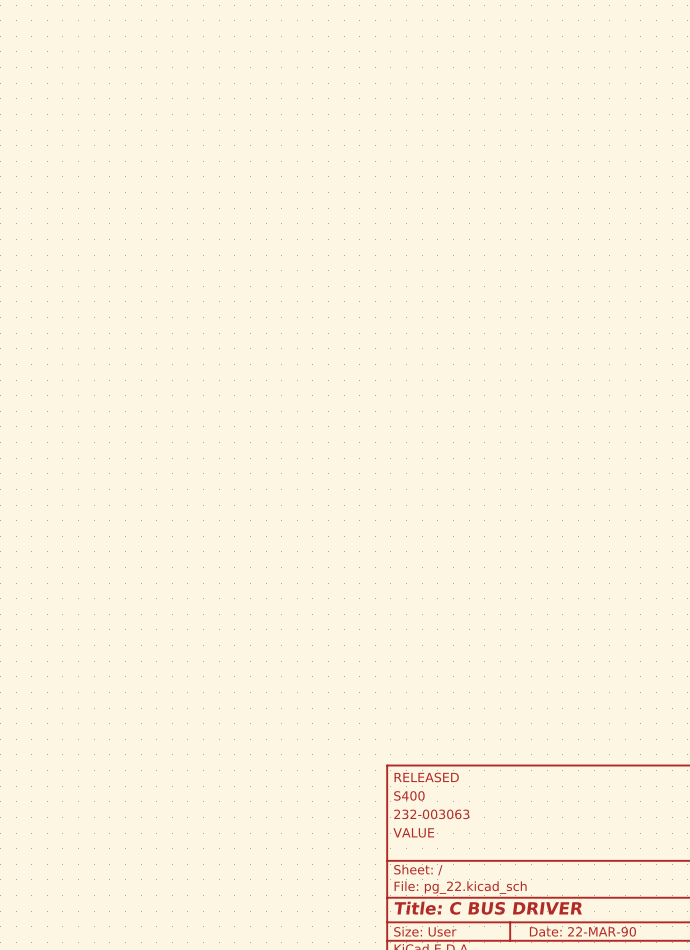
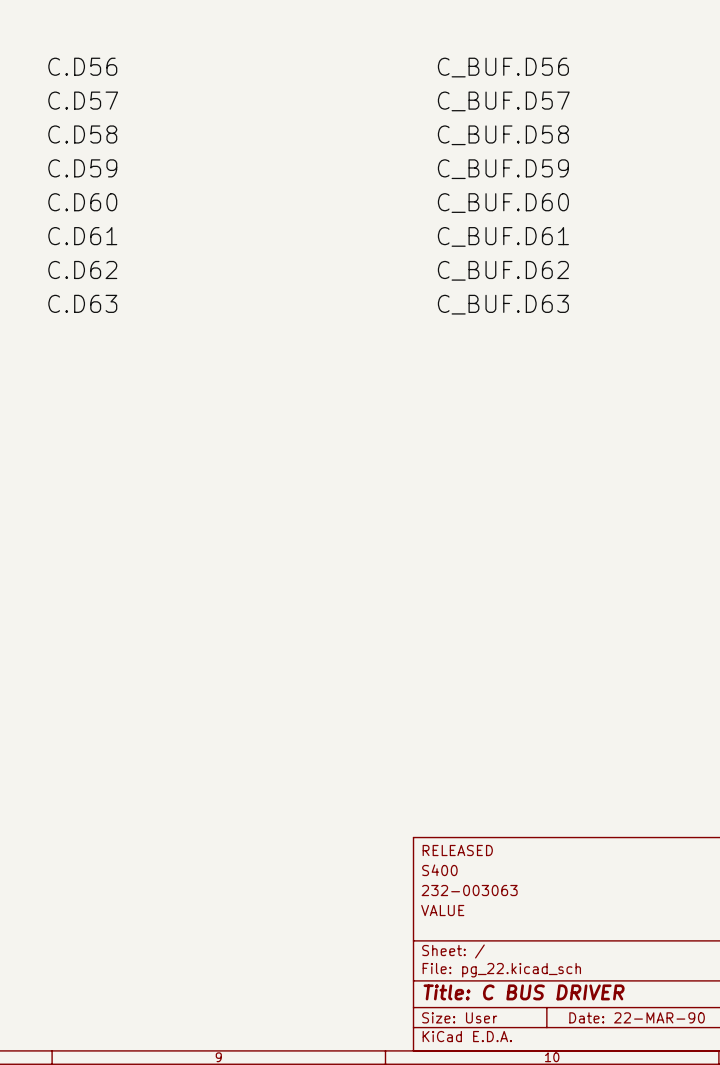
label: none -> C.D56 (82, 66)
label: none -> C_BUF.D56 (503, 67)
label: none -> C.D57 (83, 100)
label: none -> C_BUF.D57 (503, 101)
label: none -> C.D58 (82, 134)
label: none -> C_BUF.D58 (503, 135)
label: none -> C.D59 (82, 168)
label: none -> C_BUF.D59 (503, 169)
label: none -> C.D60 (82, 202)
label: none -> C_BUF.D60 (503, 203)
label: none -> C.D61 (82, 236)
label: none -> C_BUF.D61 (503, 236)
label: none -> C.D62 (82, 269)
label: none -> C_BUF.D62 (503, 270)
label: none -> C.D63 (82, 303)
label: none -> C_BUF.D63 (503, 304)

